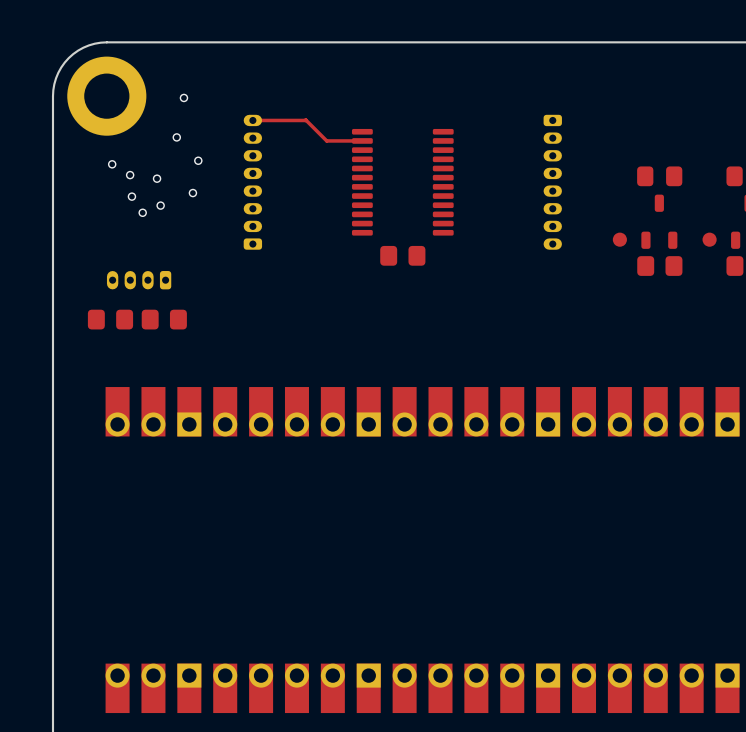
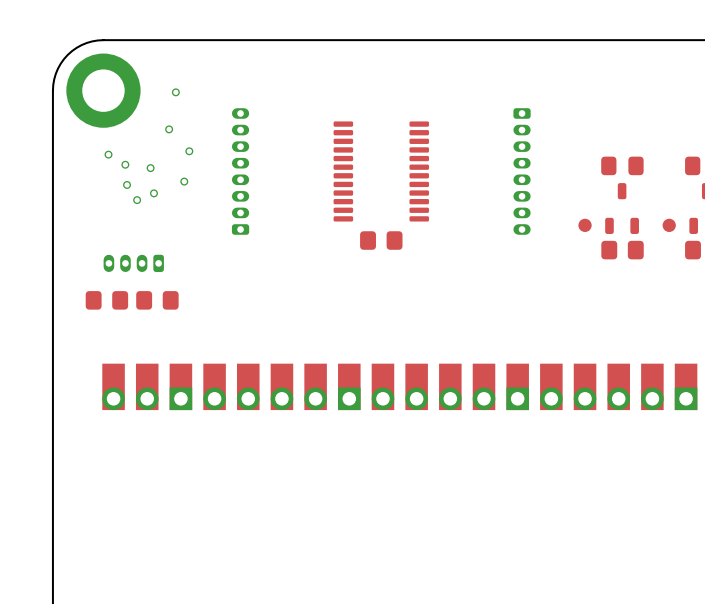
top track: (252, 120) (305, 120) (326, 140) (362, 140) -> none

